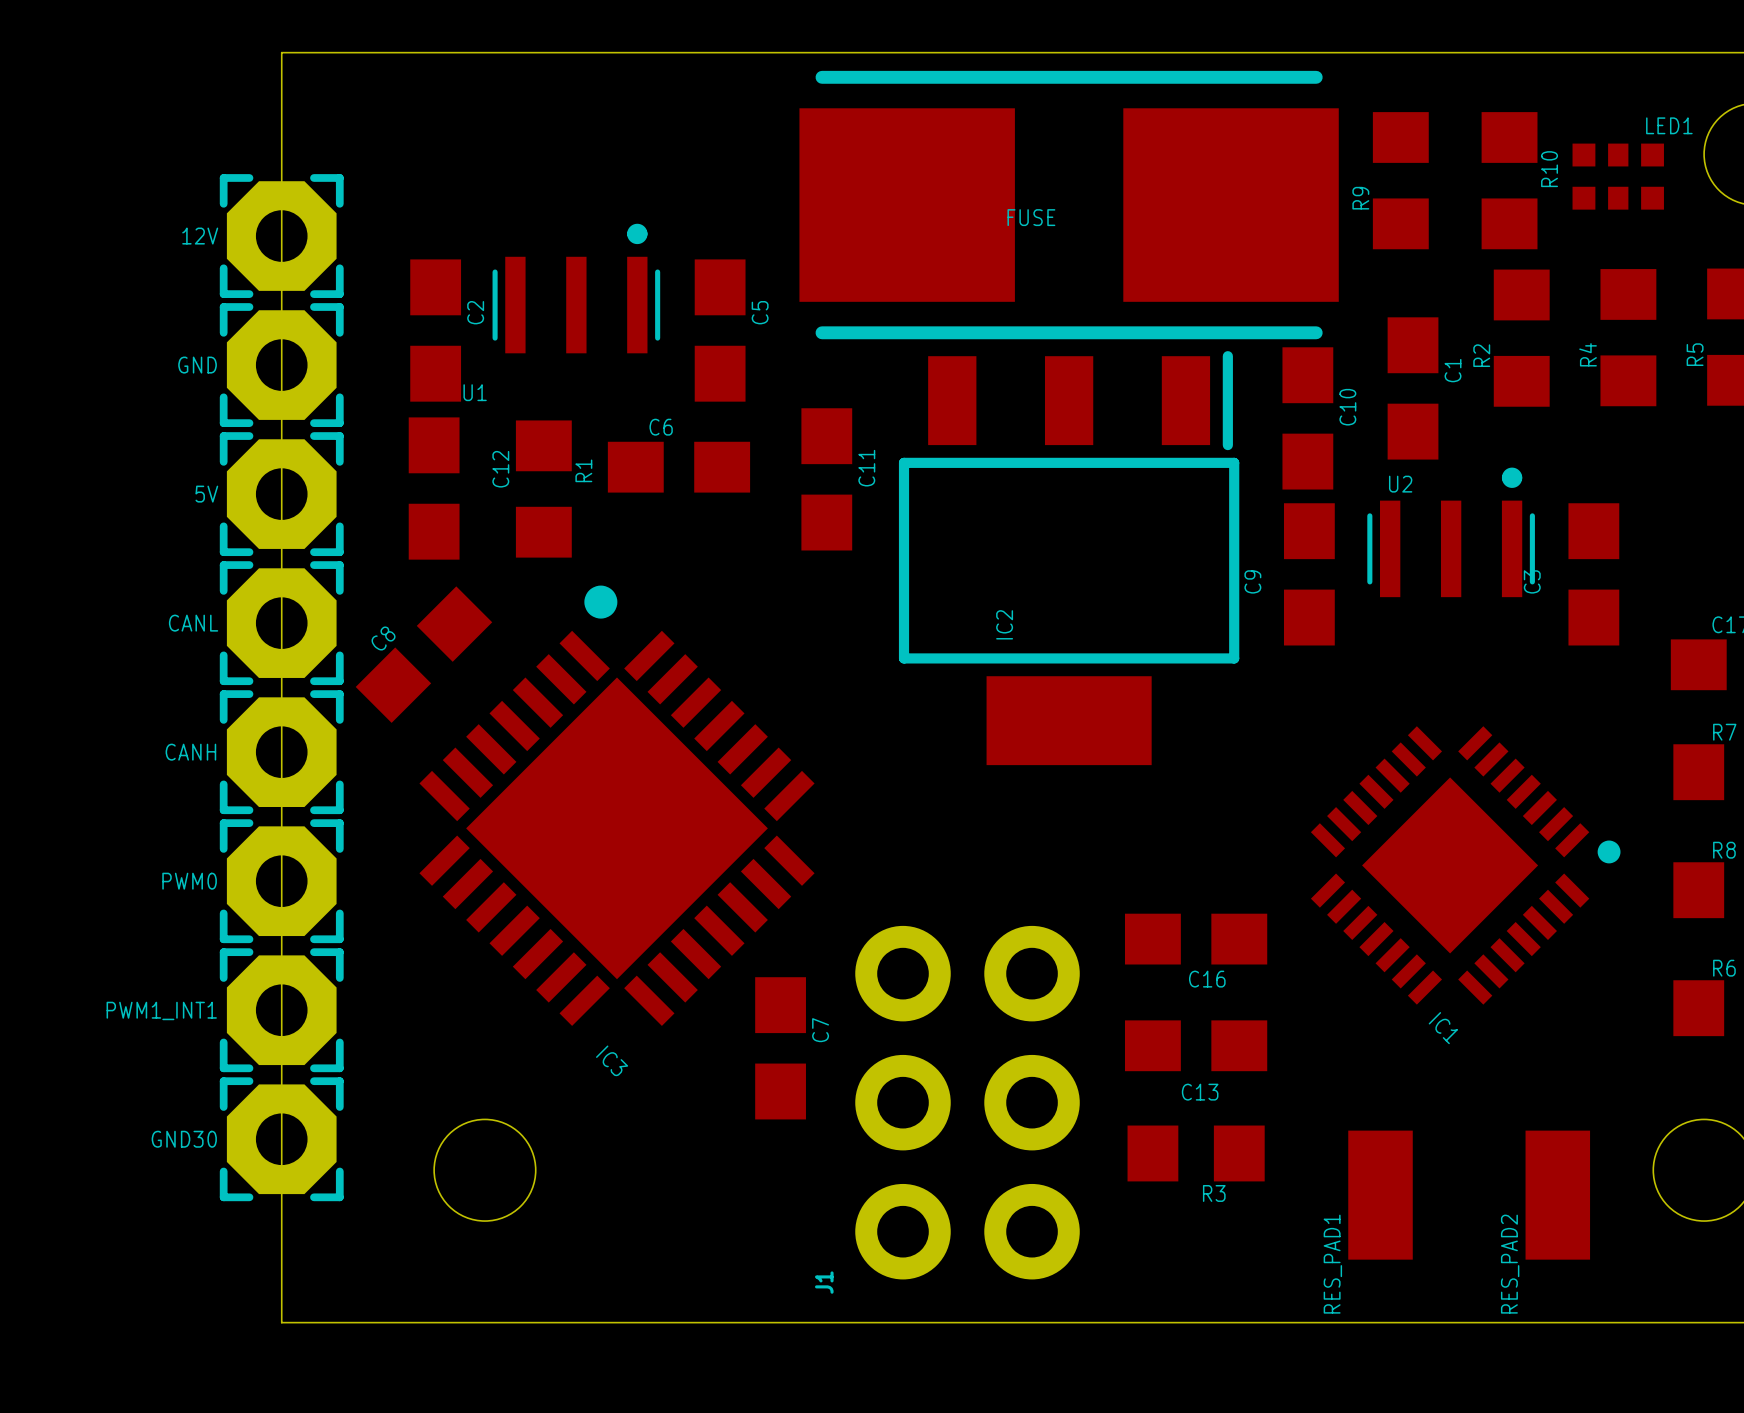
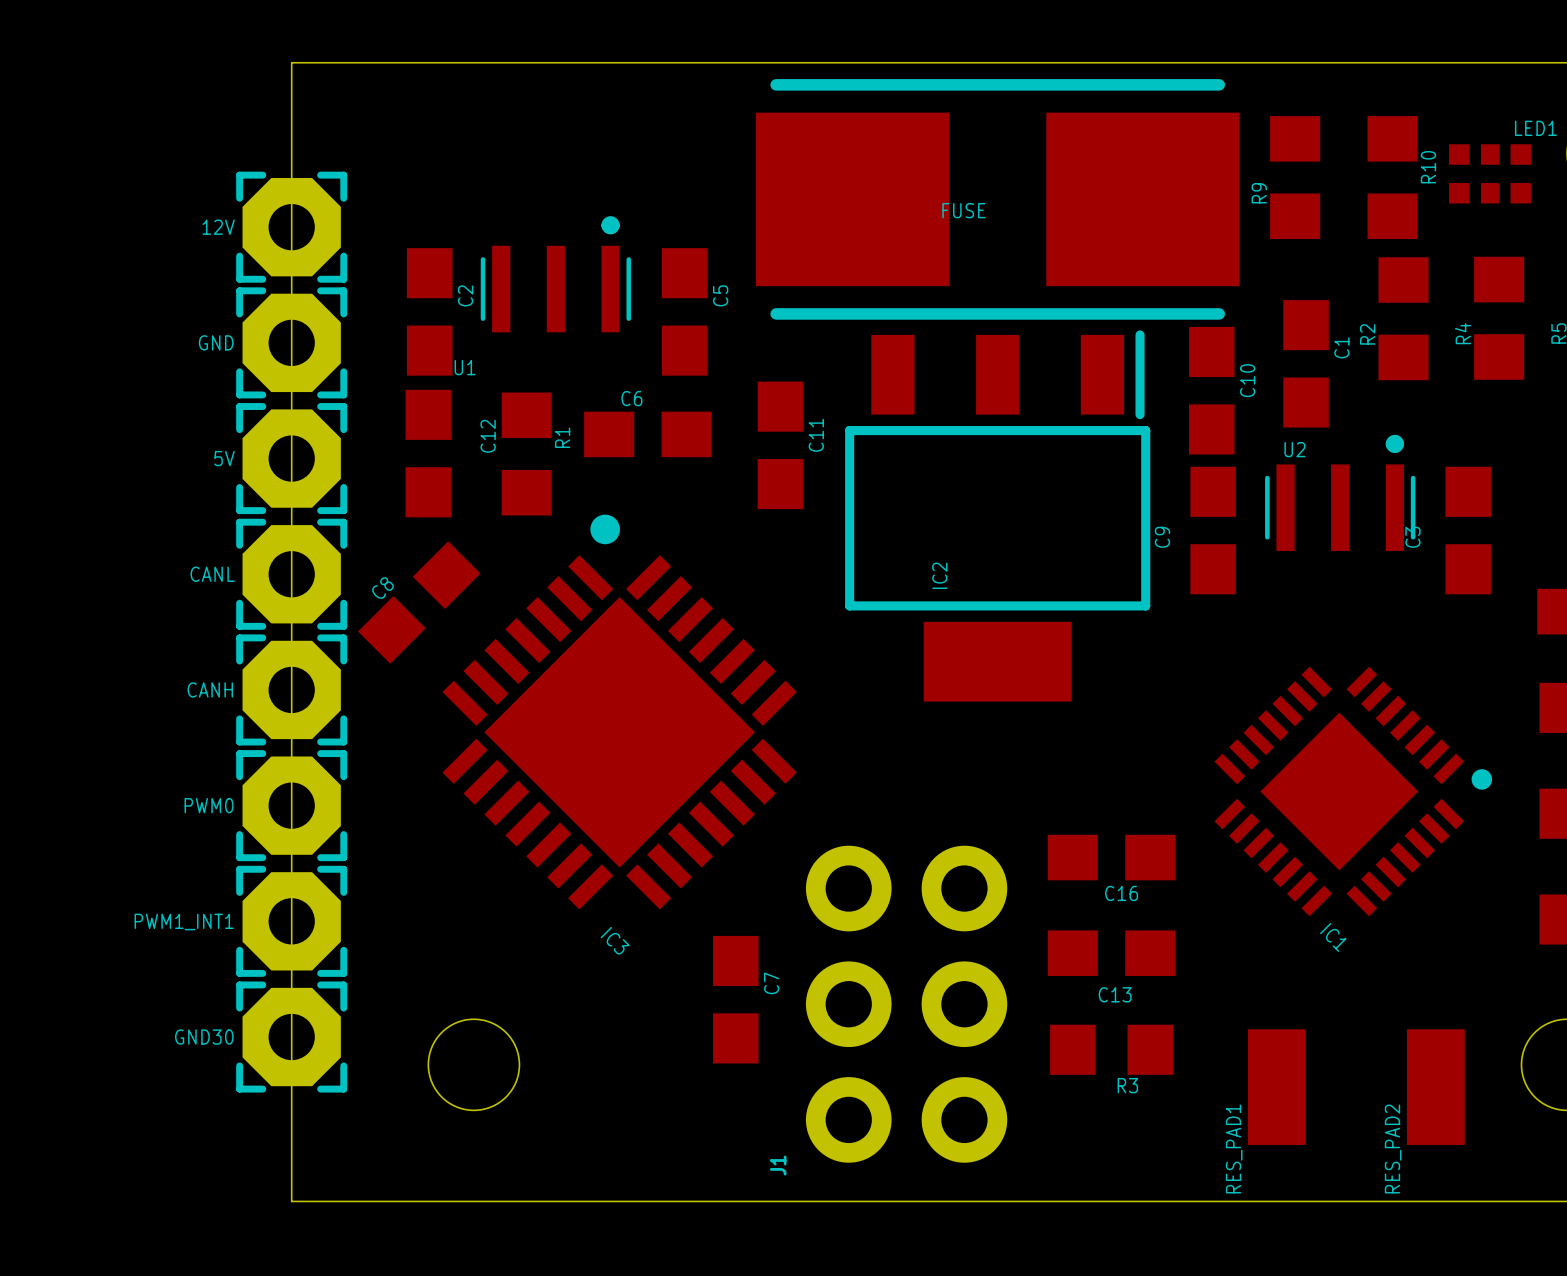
IC3 position: (617, 805) -> (619, 712)
C7 position: (780, 1048) -> (735, 999)

